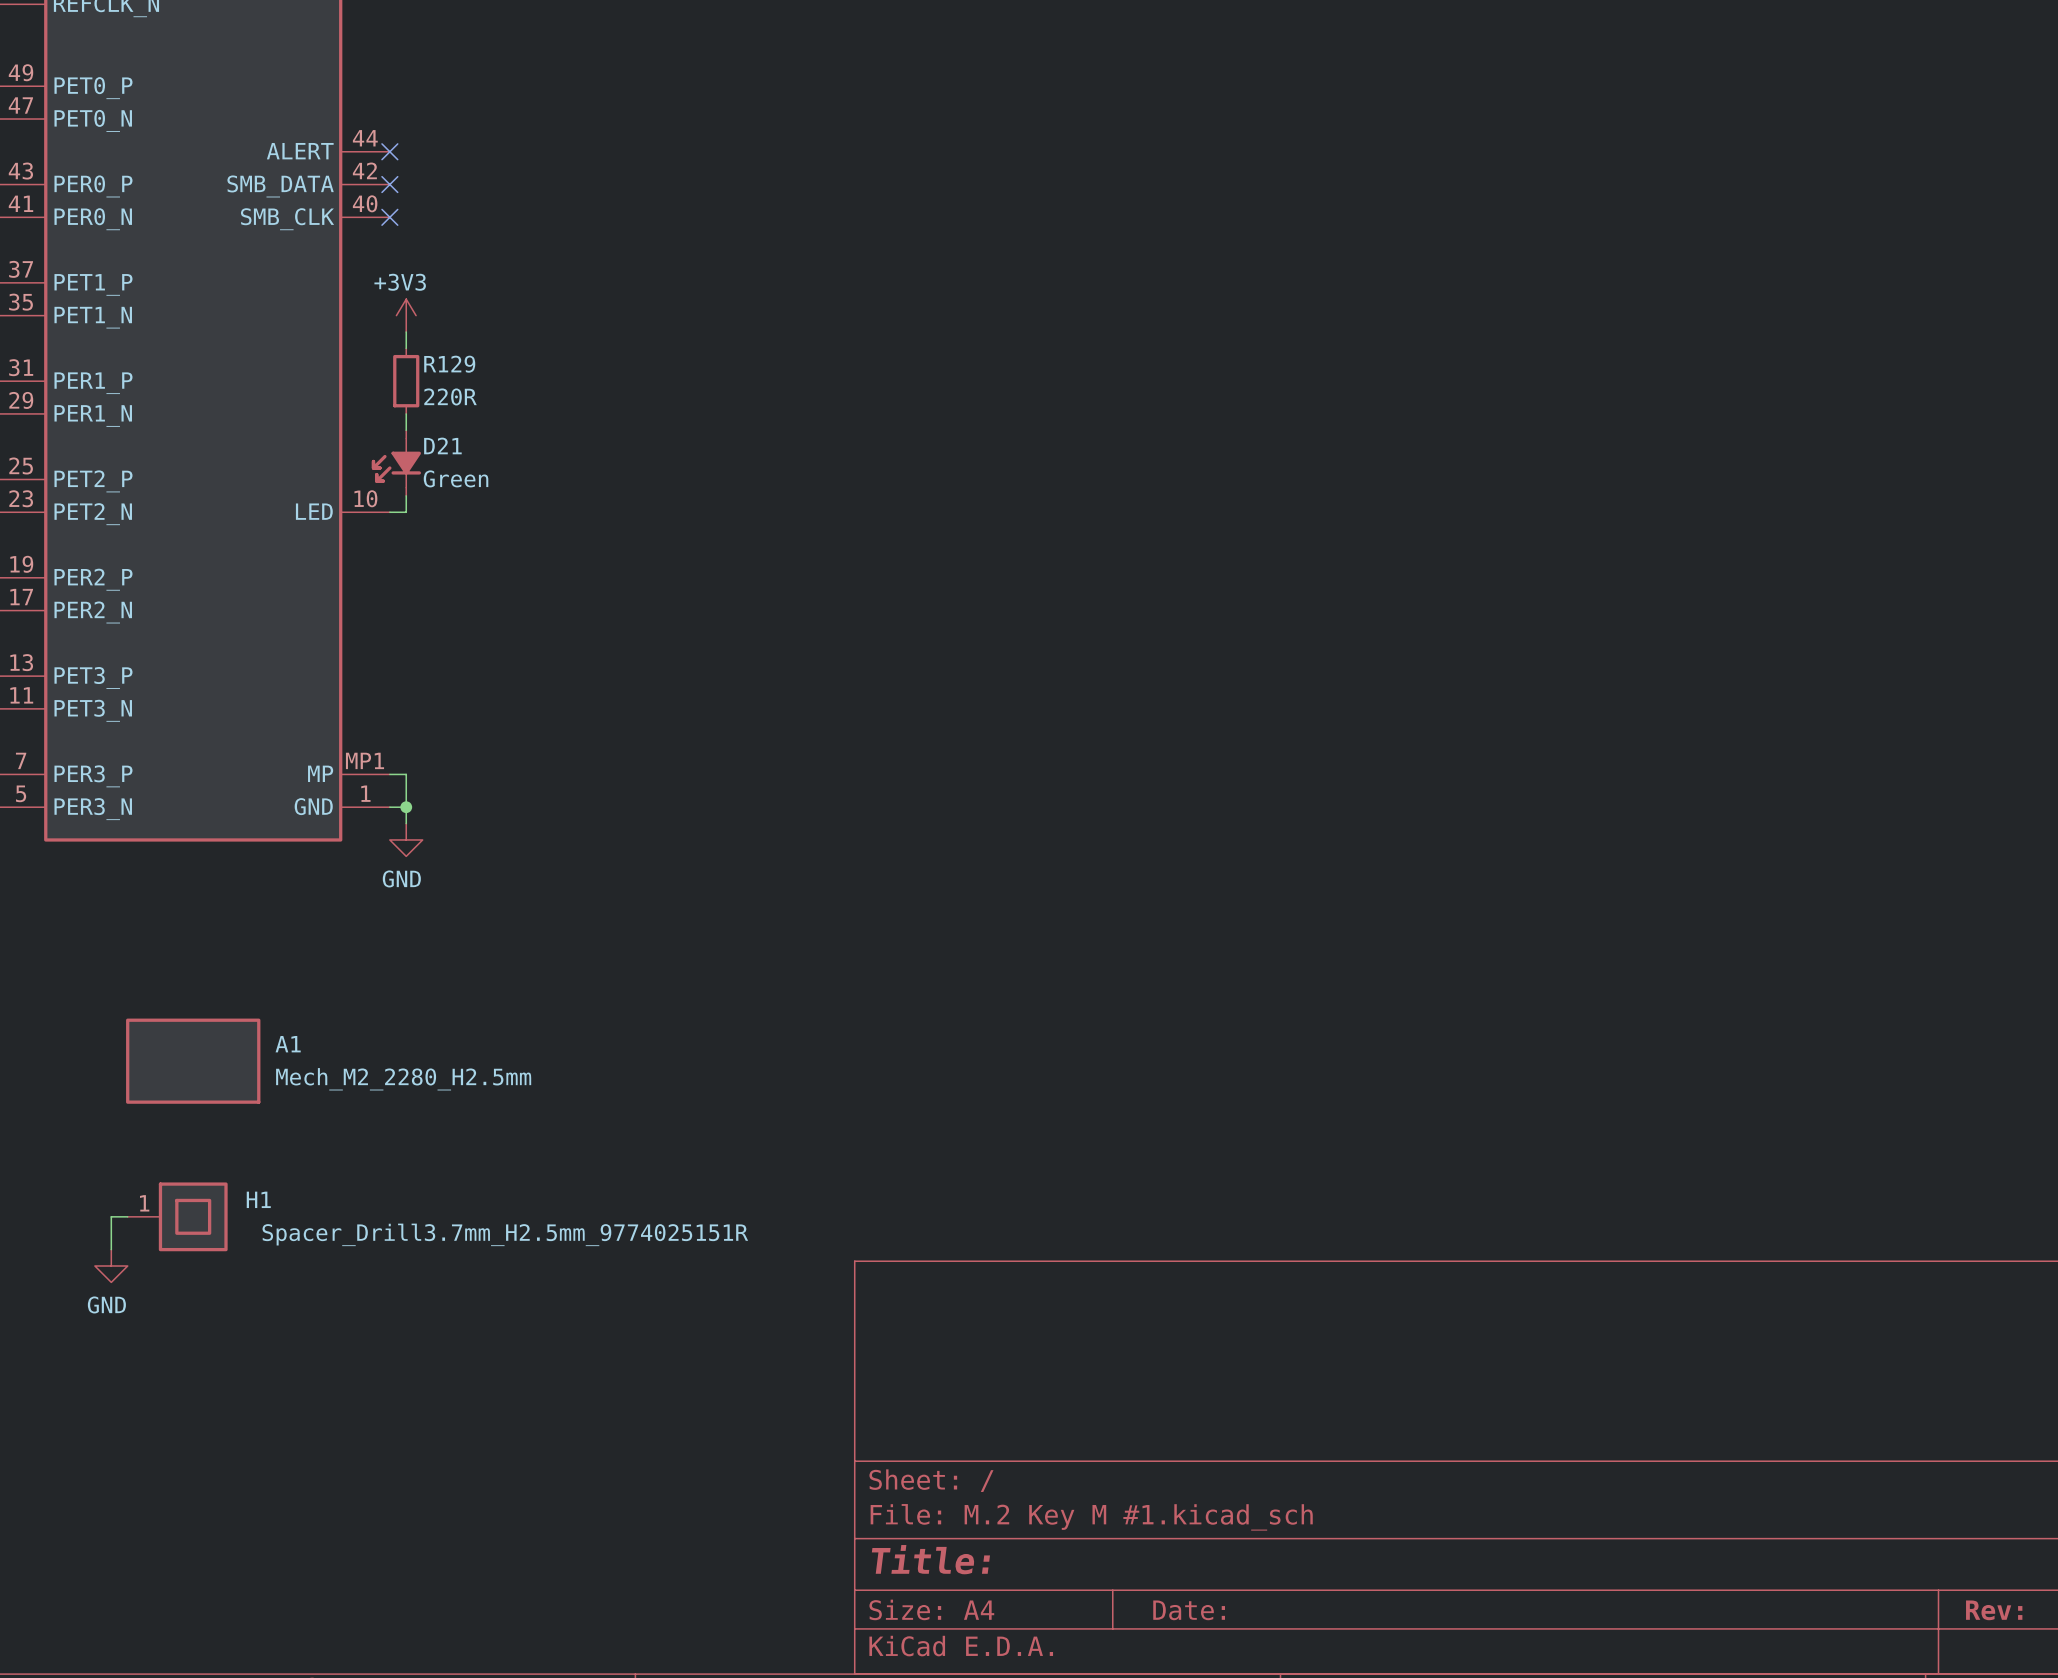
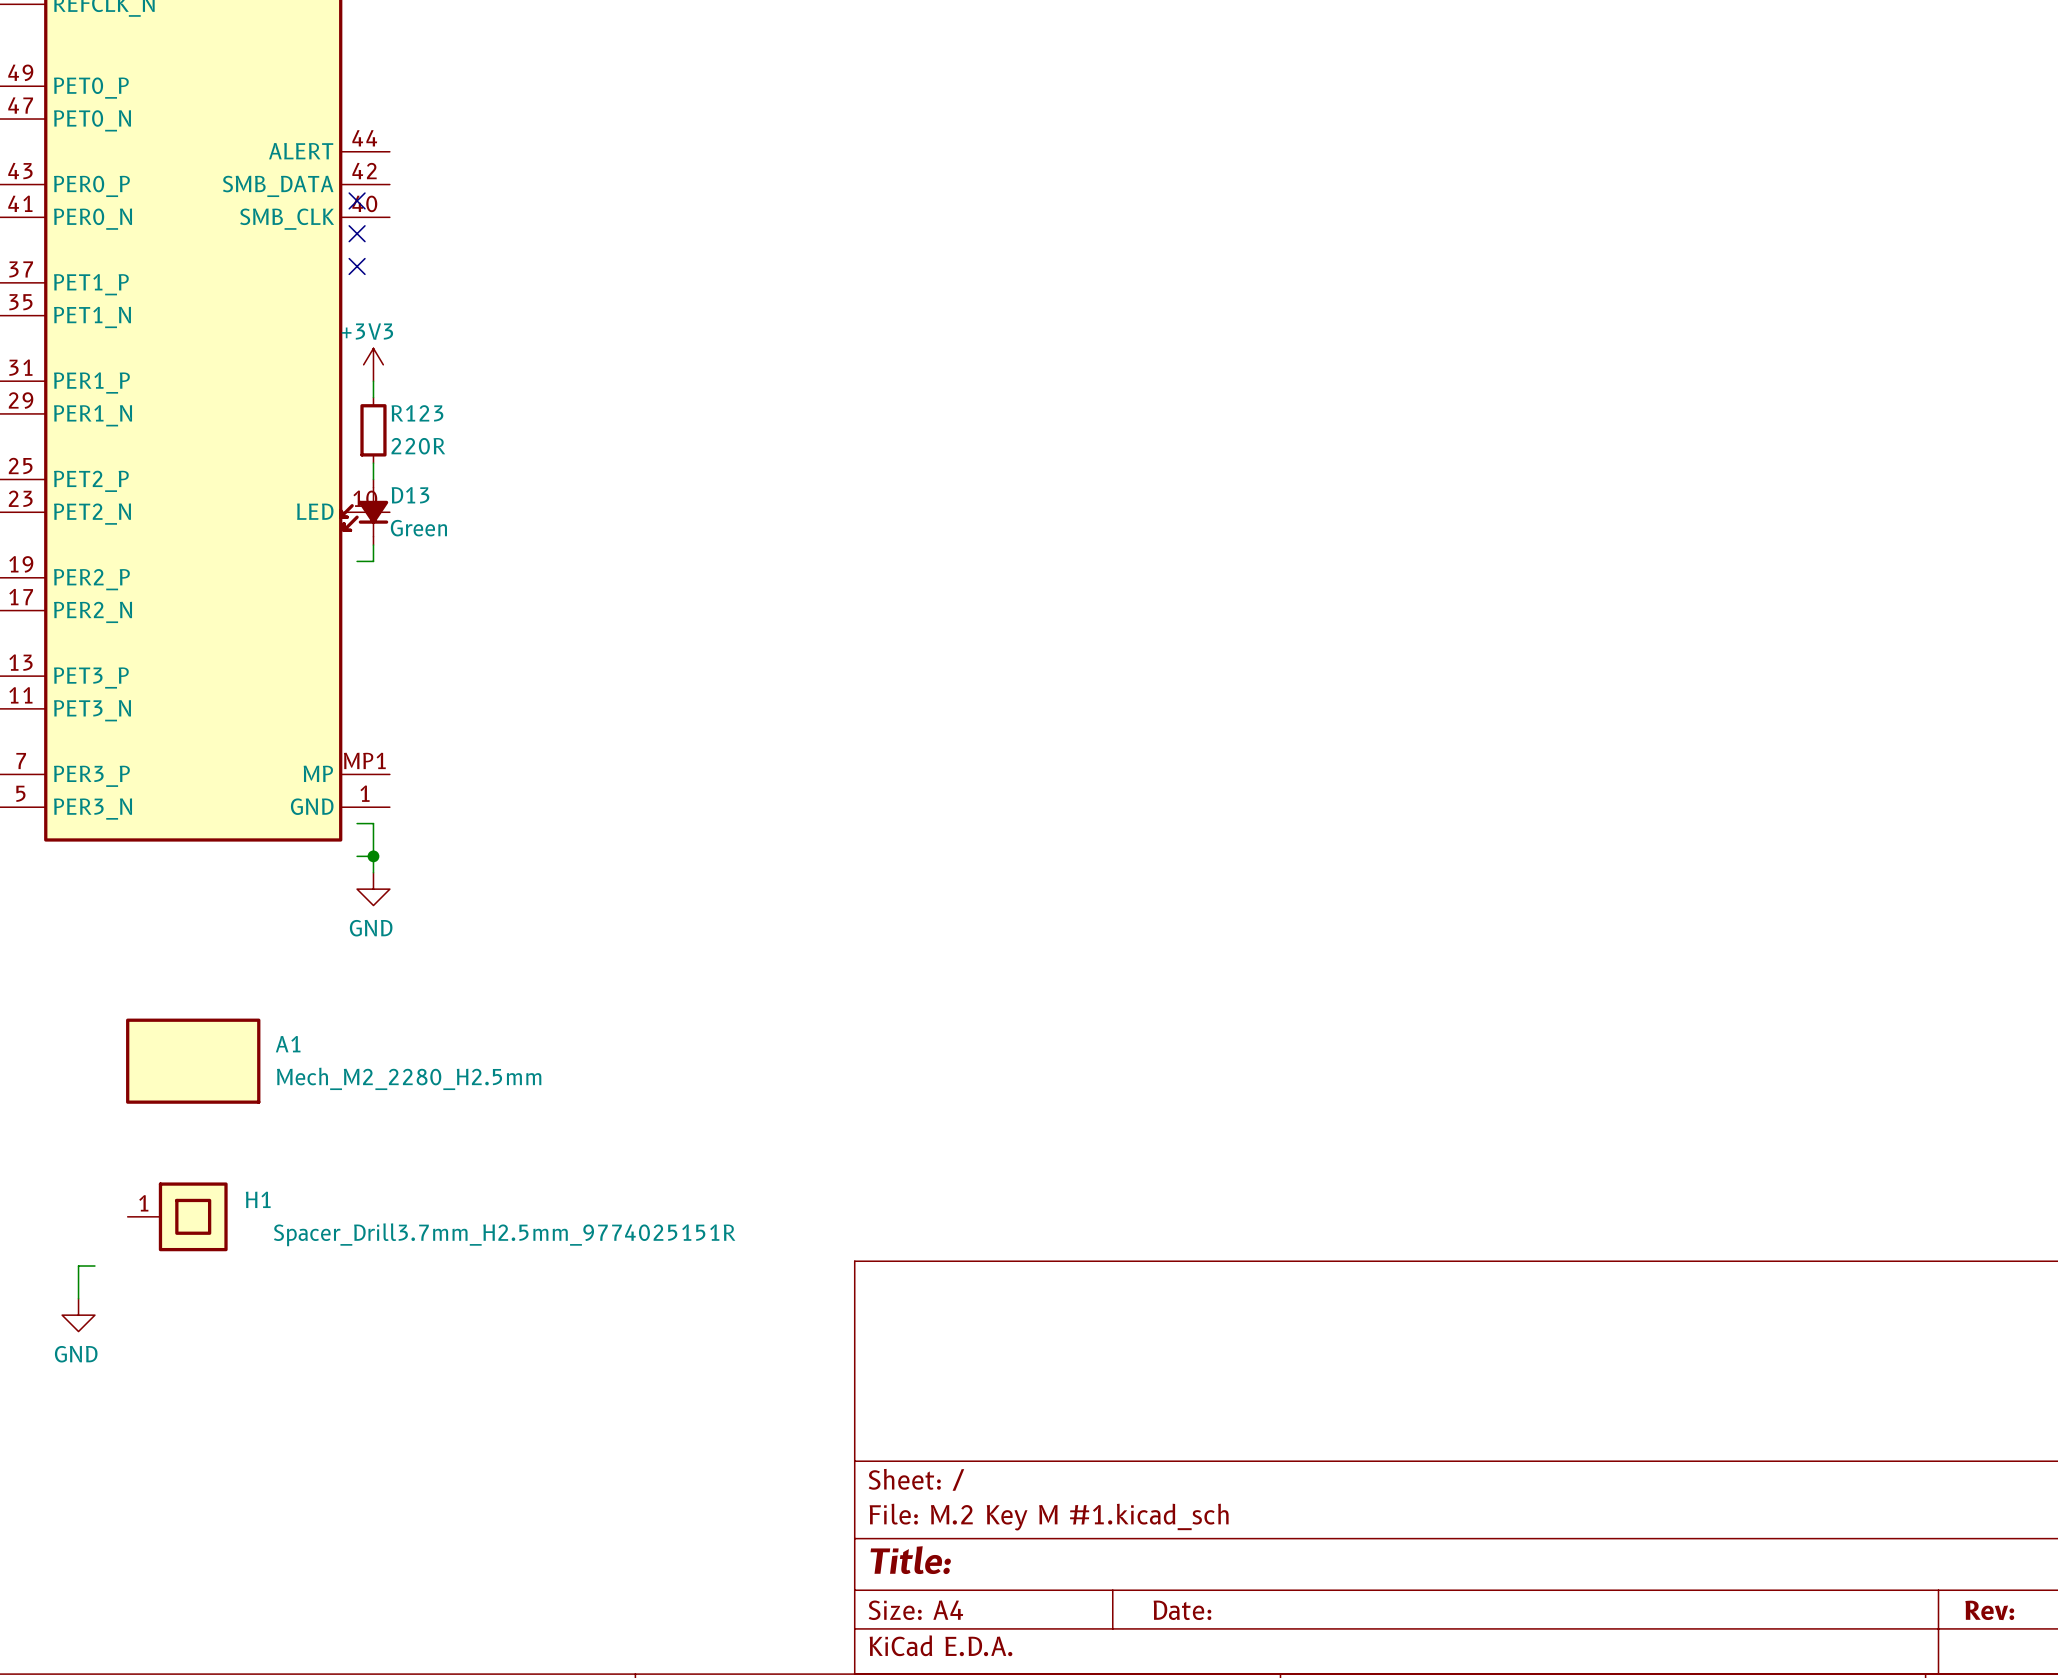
no-connect mark: (389, 151) -> none
no-connect mark: (389, 184) -> none
no-connect mark: none -> (357, 200)
no-connect mark: (389, 217) -> none
no-connect mark: none -> (357, 233)
no-connect mark: none -> (357, 266)
power symbol position: +3V3 (406, 315) -> +3V3 (373, 364)
wire: (406, 332) (406, 348) -> (373, 381) (373, 397)
R129: (406, 381) -> none
wire: (406, 413) (406, 430) -> (373, 463) (373, 479)
R123: none -> (373, 430)
D21: (396, 463) -> none
wire: (406, 495) (406, 512) (389, 512) -> (373, 545) (373, 561) (357, 561)
D13: none -> (363, 512)
wire: (389, 774) (406, 774) (406, 823) -> (357, 823) (373, 823) (373, 872)
wire: (389, 807) (406, 807) -> (357, 856) (373, 856)
junction position: (406, 807) -> (373, 856)
power symbol position: GND (406, 839) -> GND (373, 889)
wire: (127, 1216) (111, 1216) (111, 1249) -> (94, 1266) (78, 1266) (78, 1298)
power symbol position: GND (111, 1266) -> GND (78, 1315)

